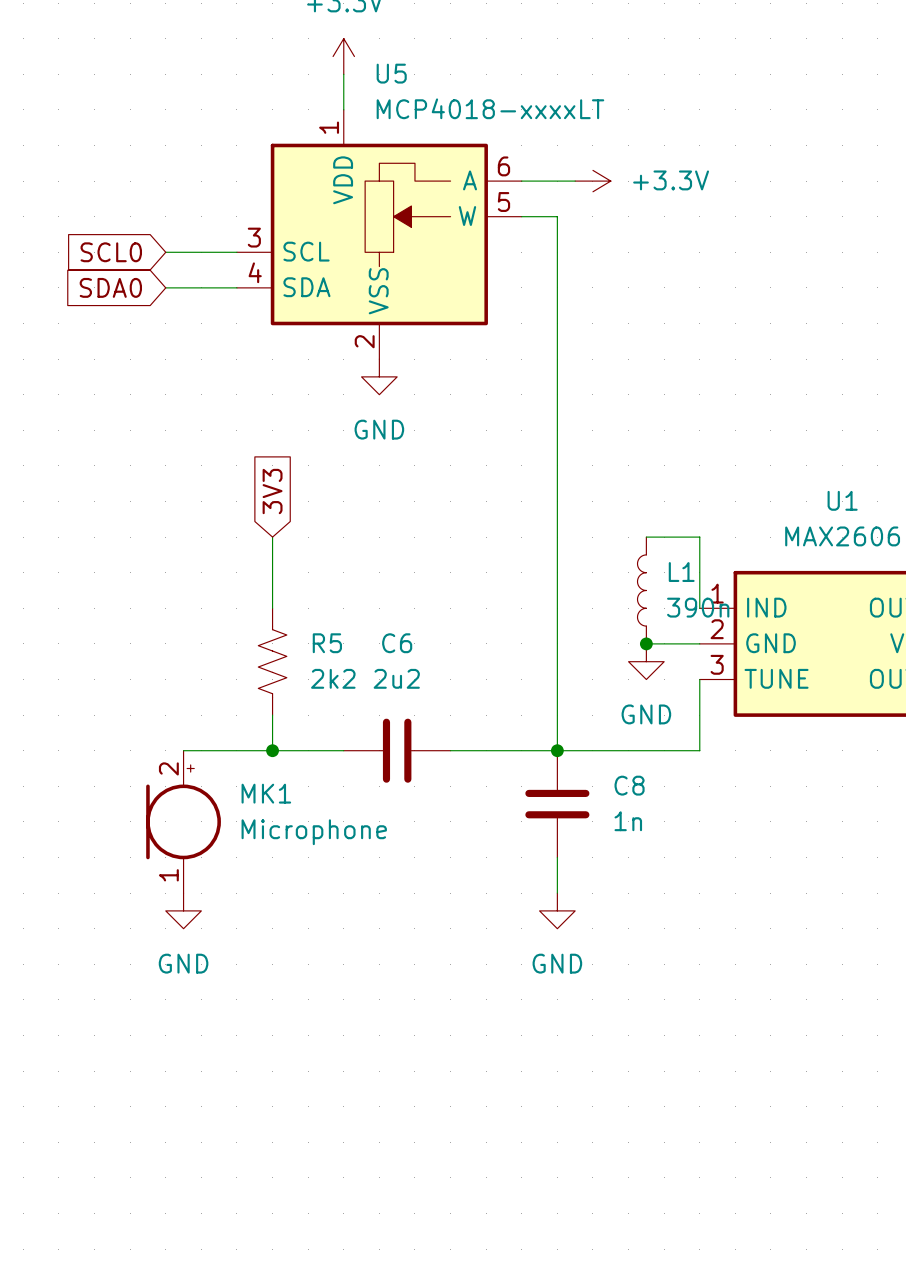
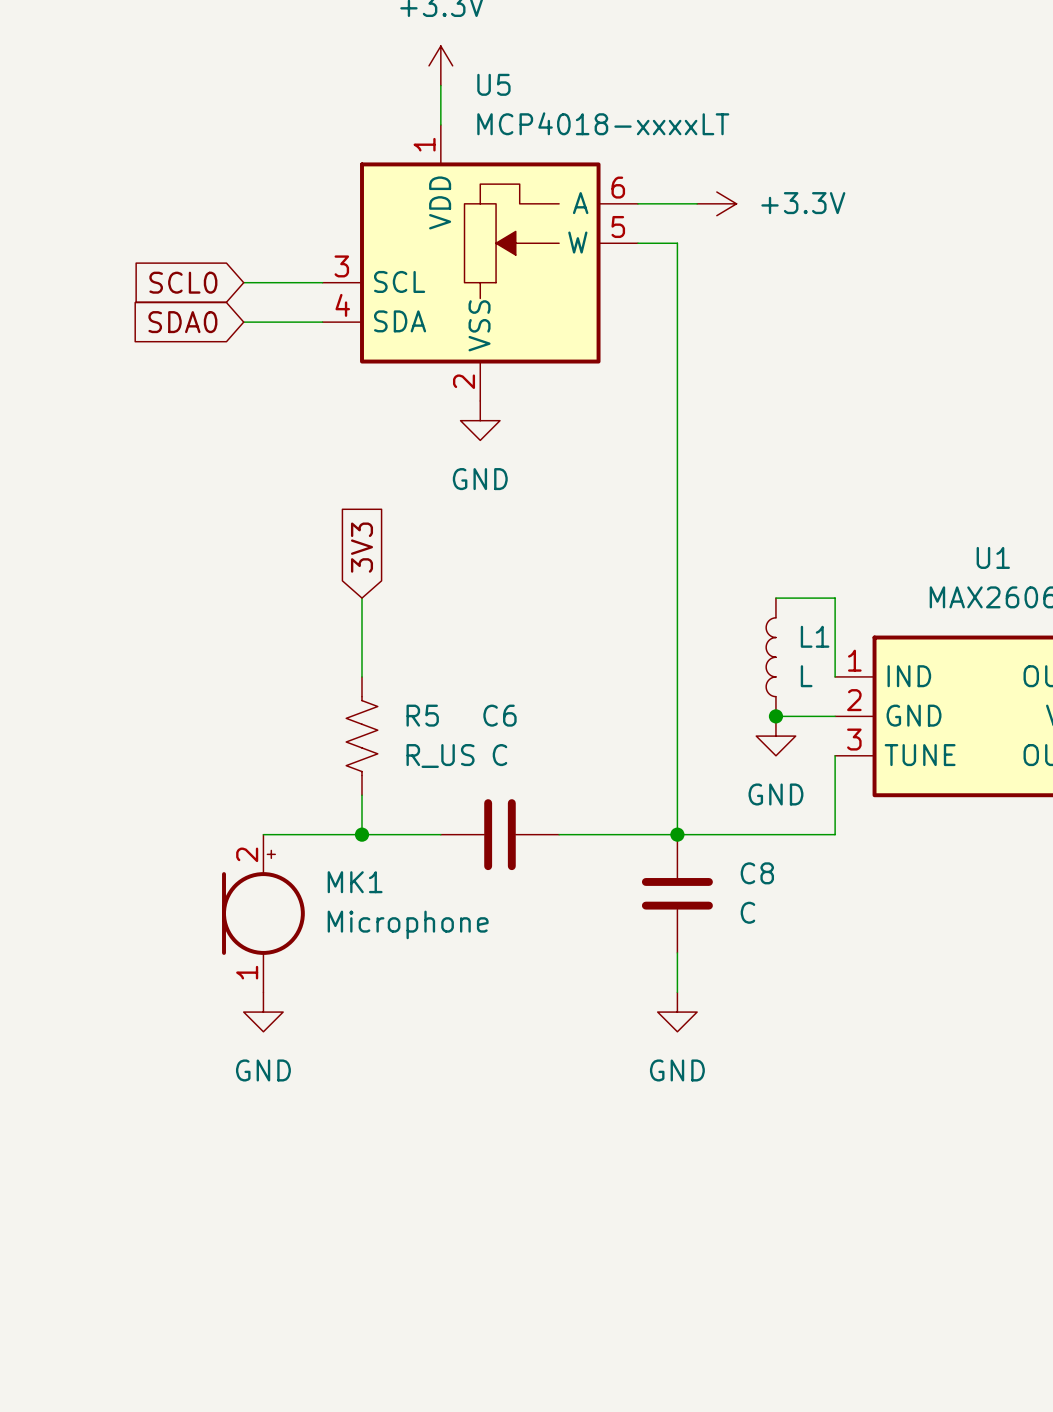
L1 value: 390n (698, 607) -> L (806, 676)
R5 value: 2k2 (333, 678) -> R_US (440, 756)
C6 value: 2u2 (396, 678) -> C (499, 755)
C8 value: 1n (628, 821) -> C (747, 912)

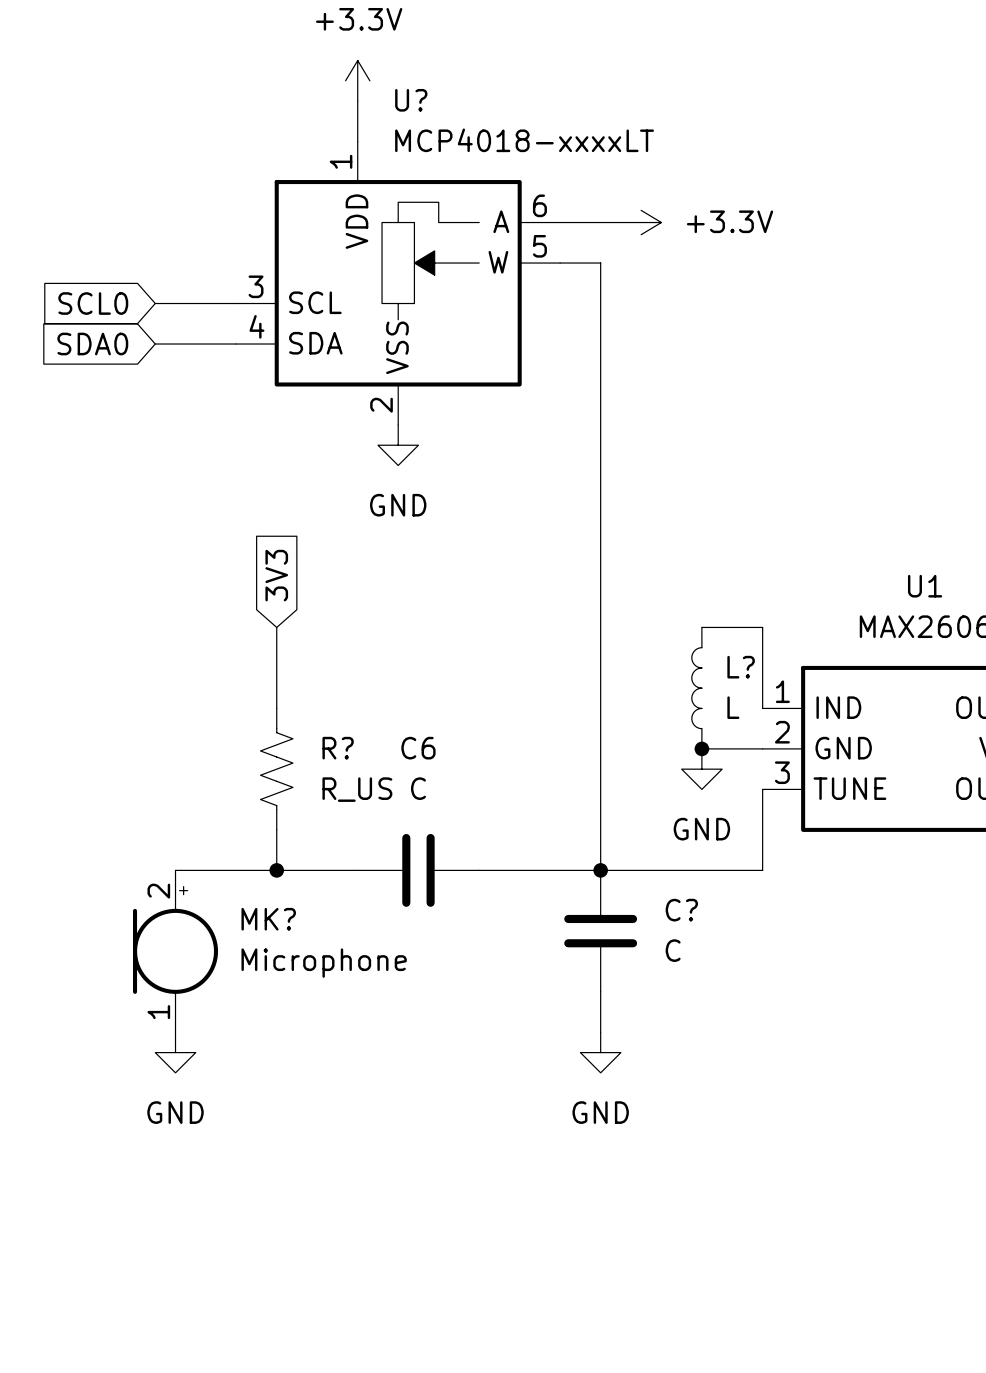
U5 name: U5 (493, 84) -> U? (411, 100)
L1 name: L1 (815, 636) -> L? (741, 667)
R5 name: R5 (422, 715) -> R? (338, 748)
C8 name: C8 (757, 873) -> C? (681, 910)
MK1 name: MK1 (355, 882) -> MK? (268, 919)

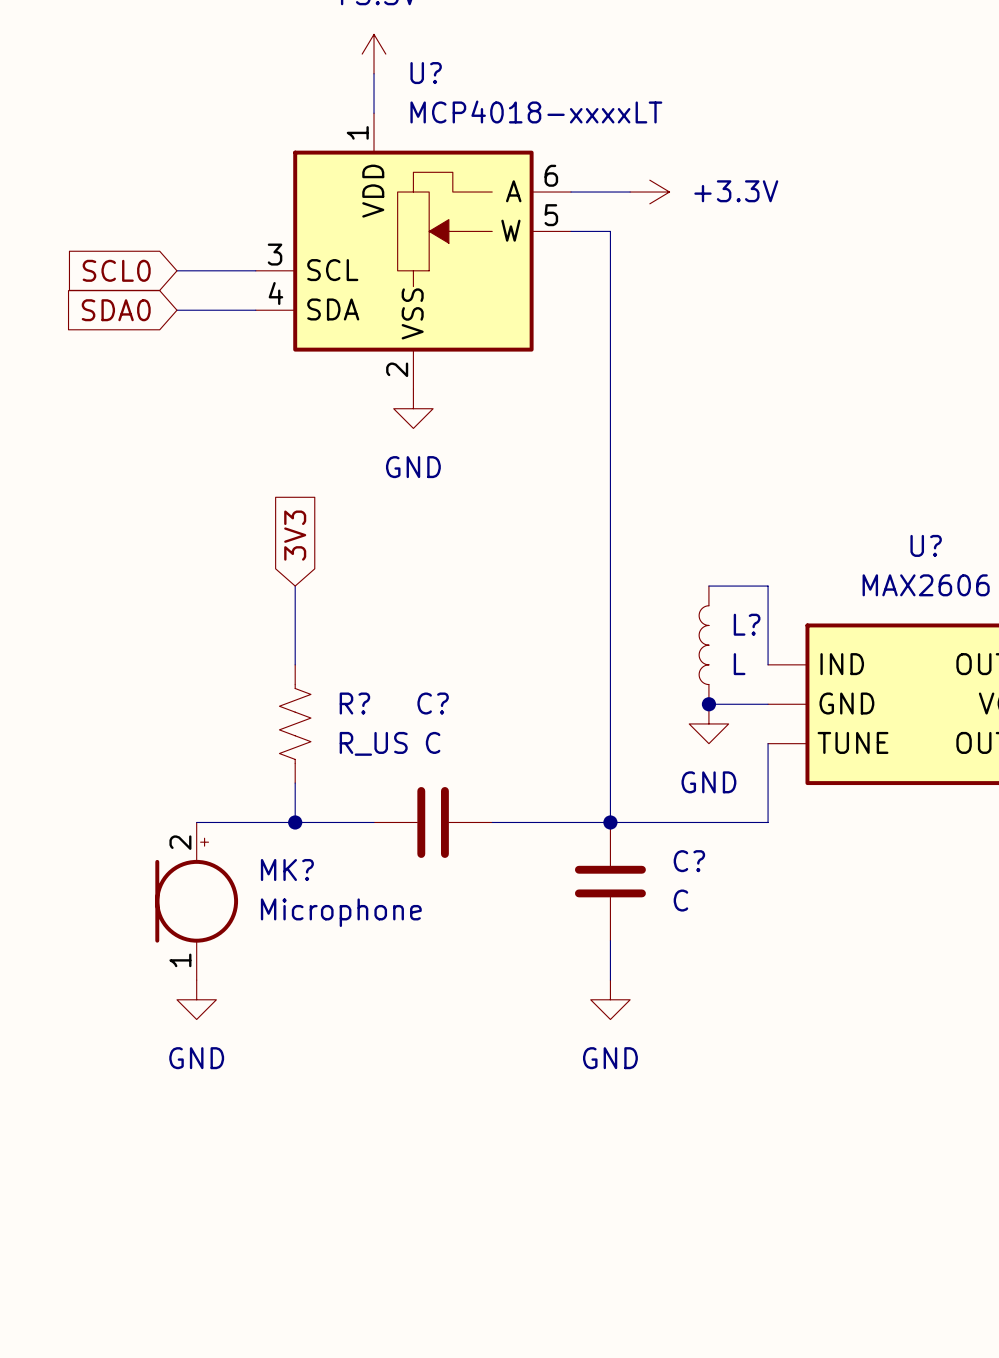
U1 name: U1 (925, 586) -> U? (926, 545)
U1 pin number: 1 (782, 691) -> none
U1 pin number: 2 (782, 732) -> none
C6 name: C6 (418, 748) -> C? (433, 703)
U1 pin number: 3 (782, 772) -> none

